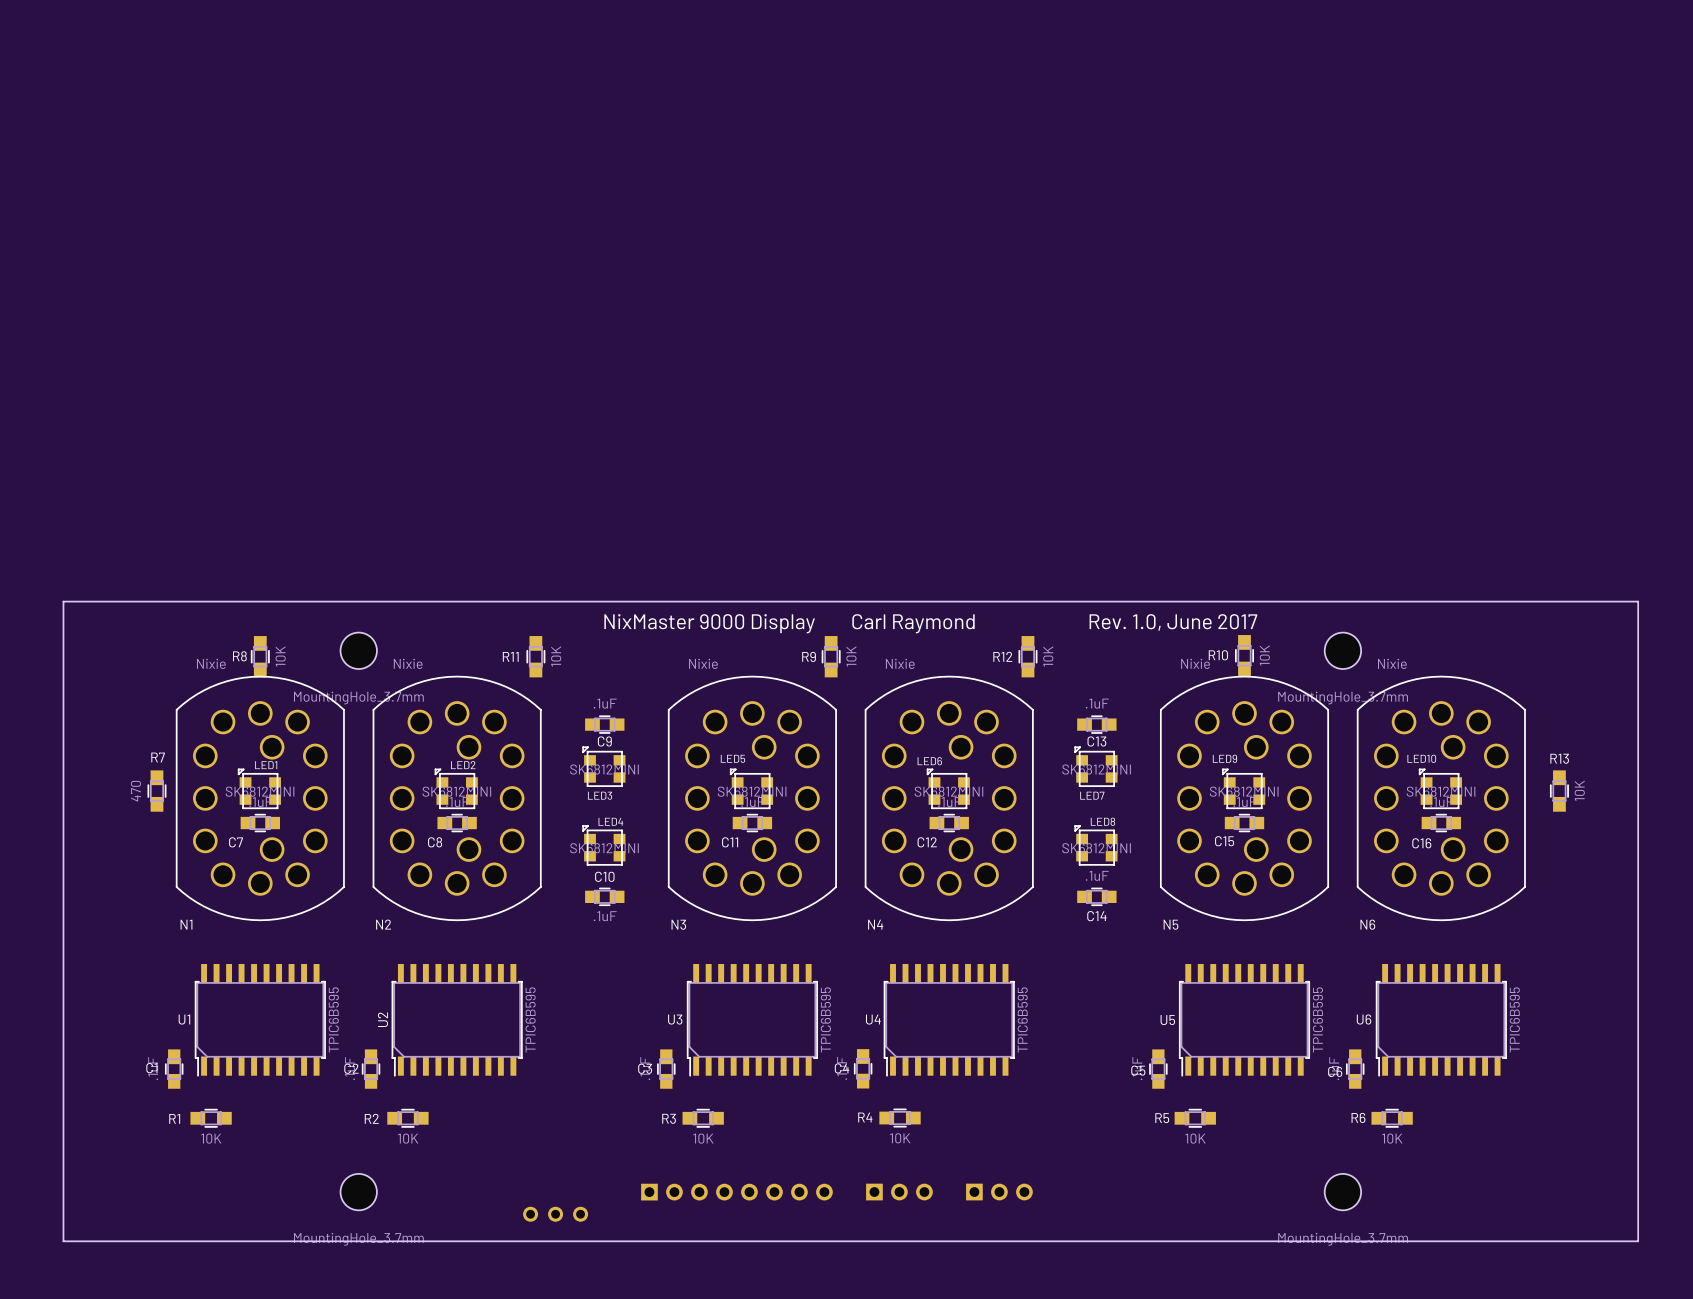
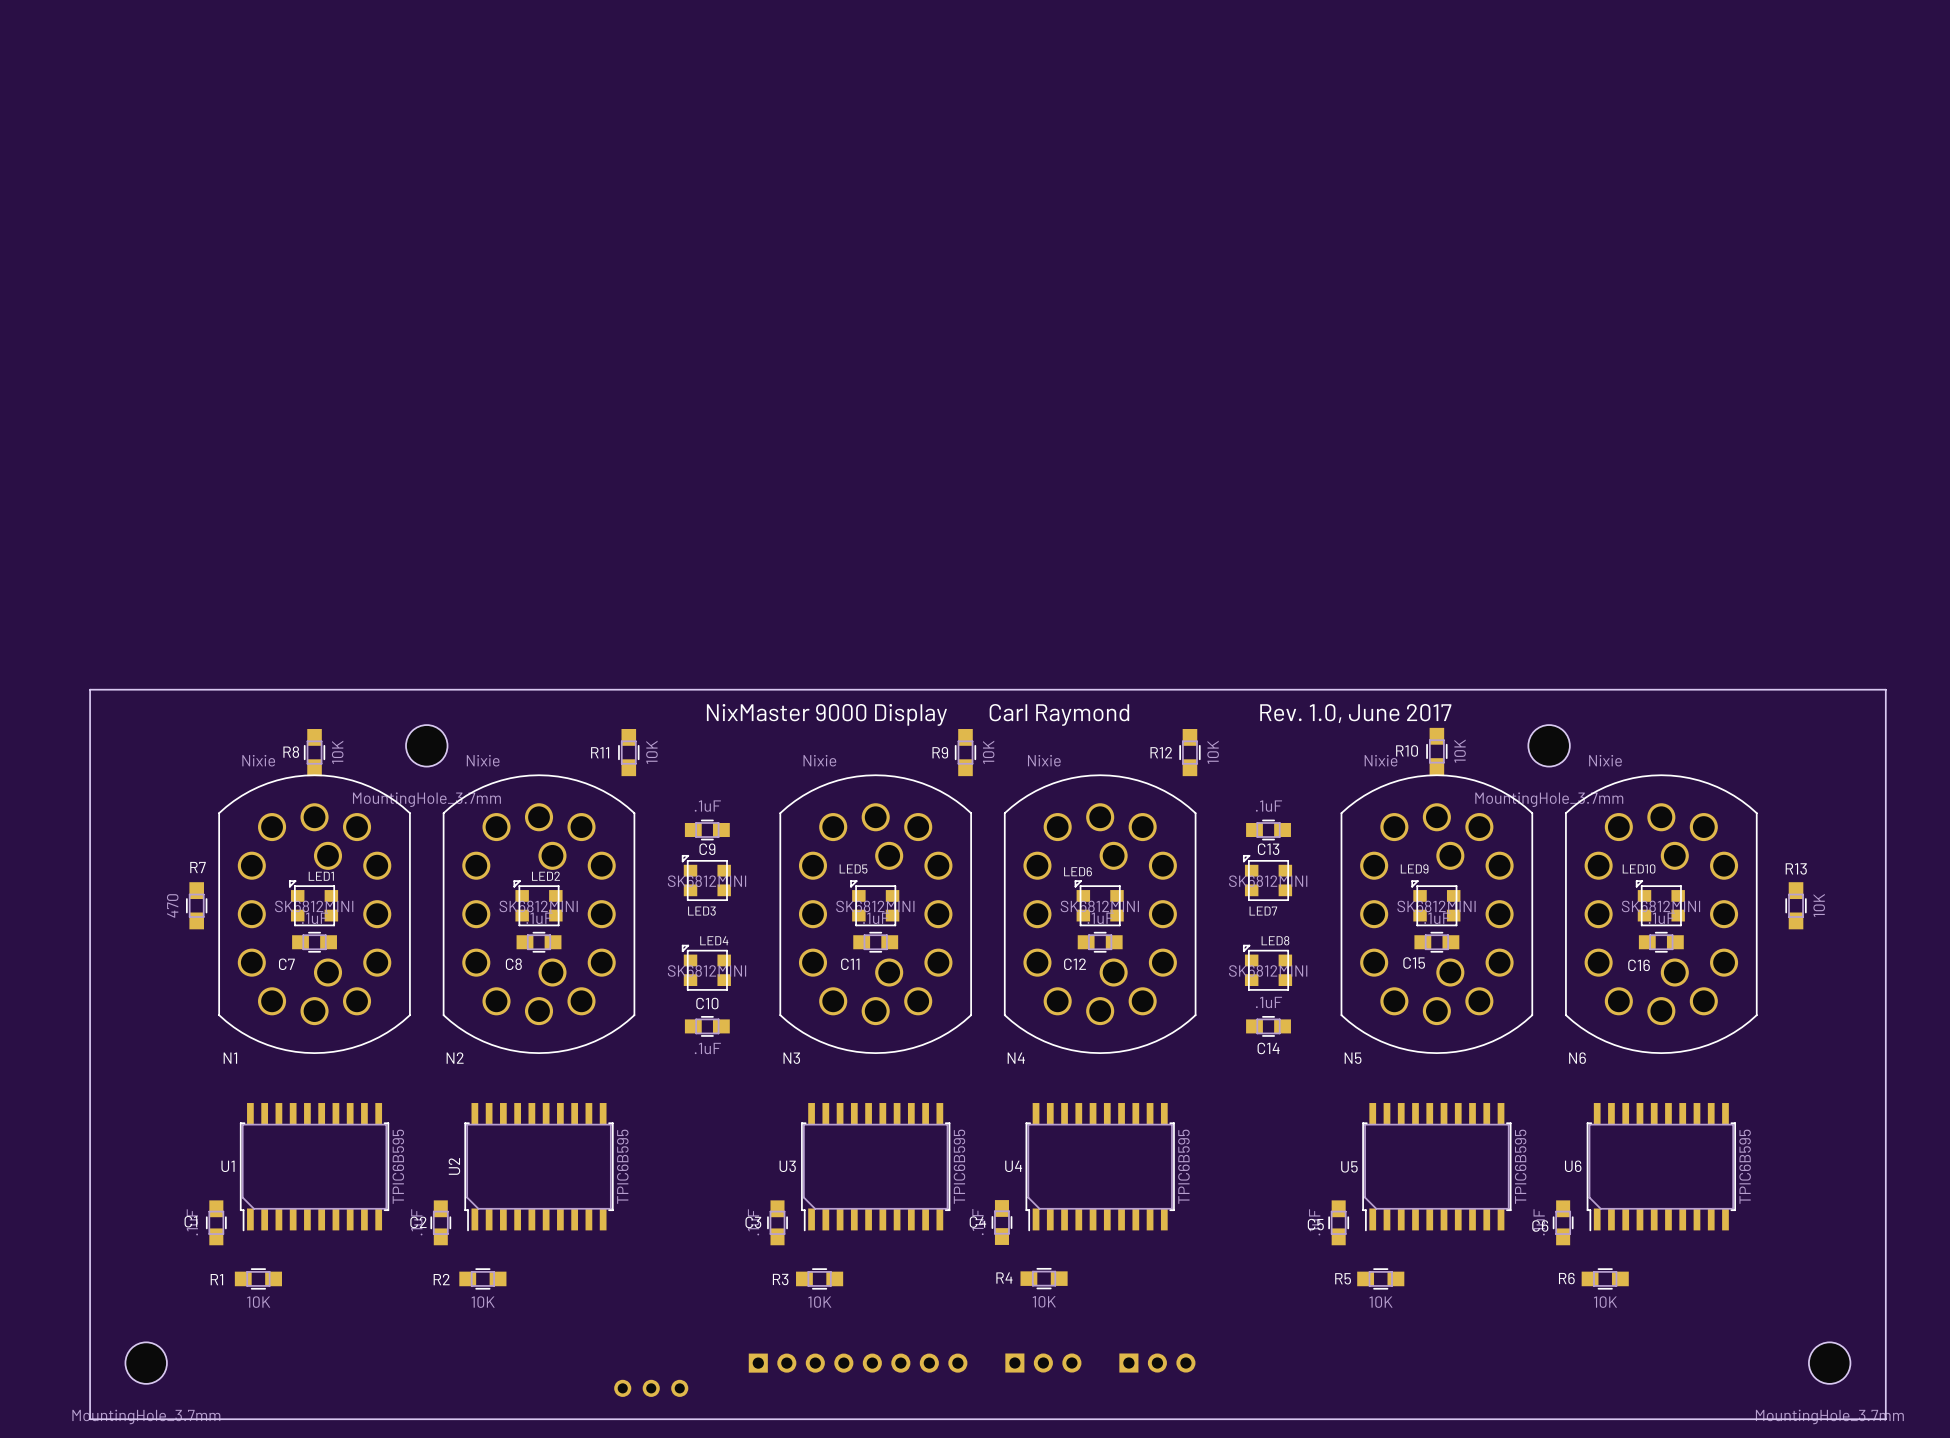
part position: (358, 1192) -> (146, 1363)
part position: (1342, 1192) -> (1829, 1363)

